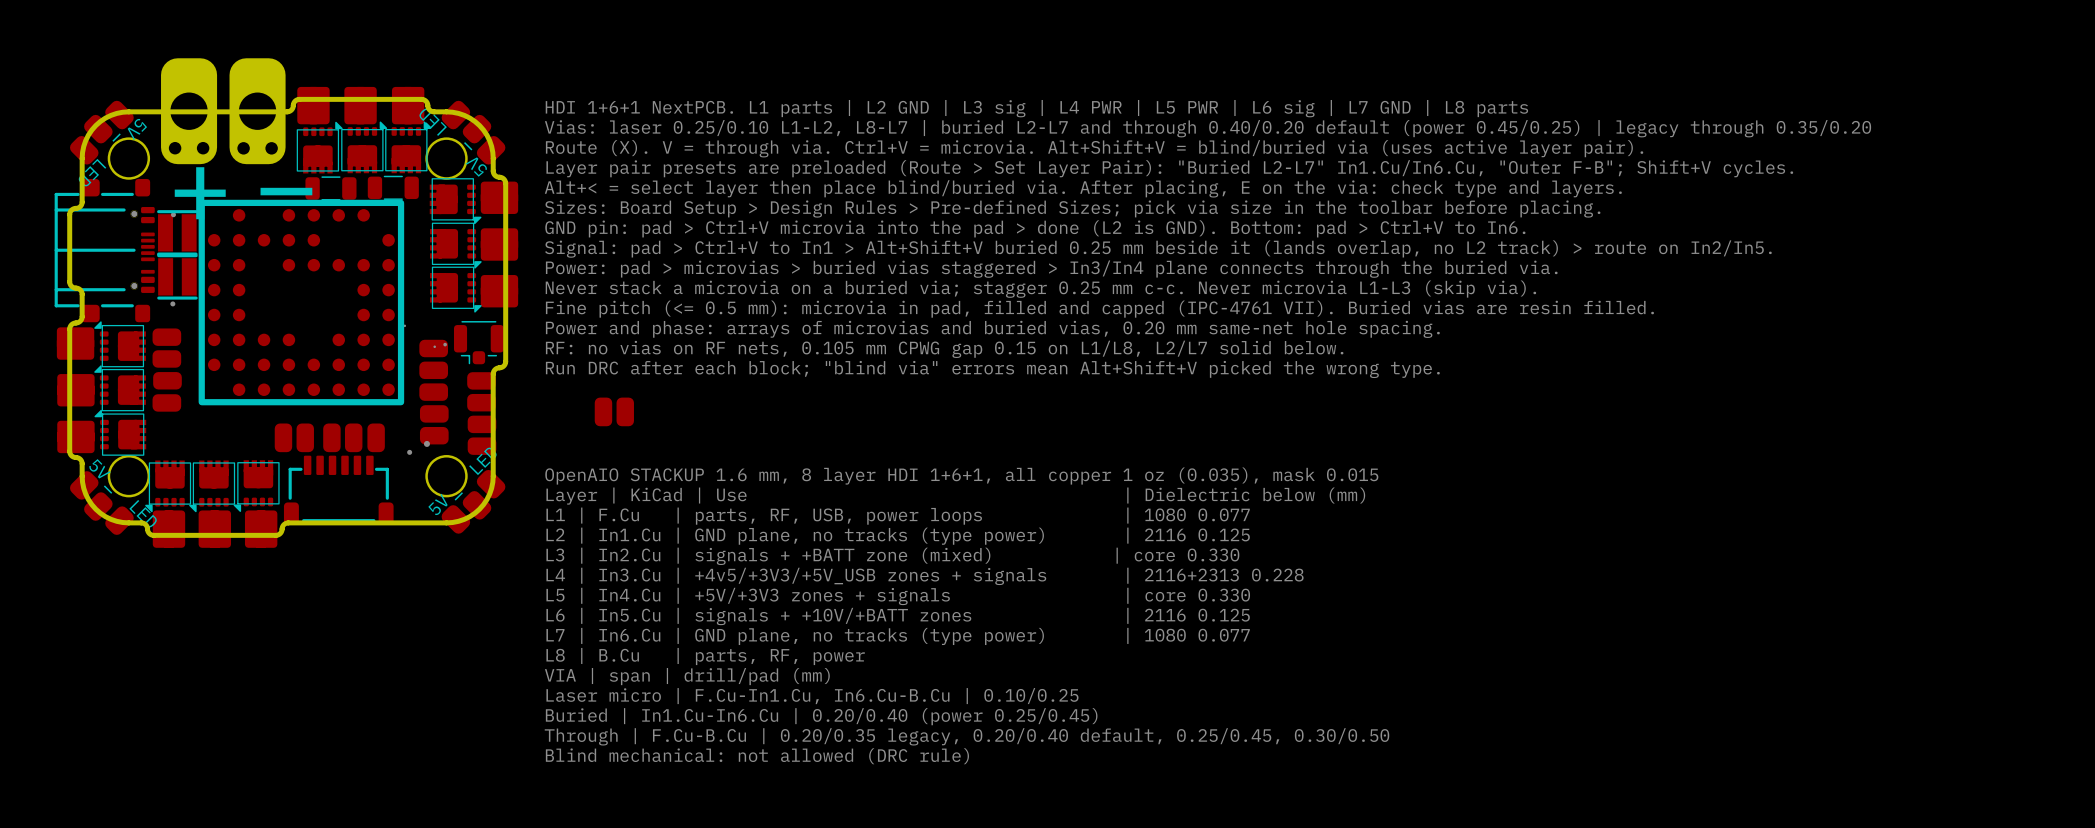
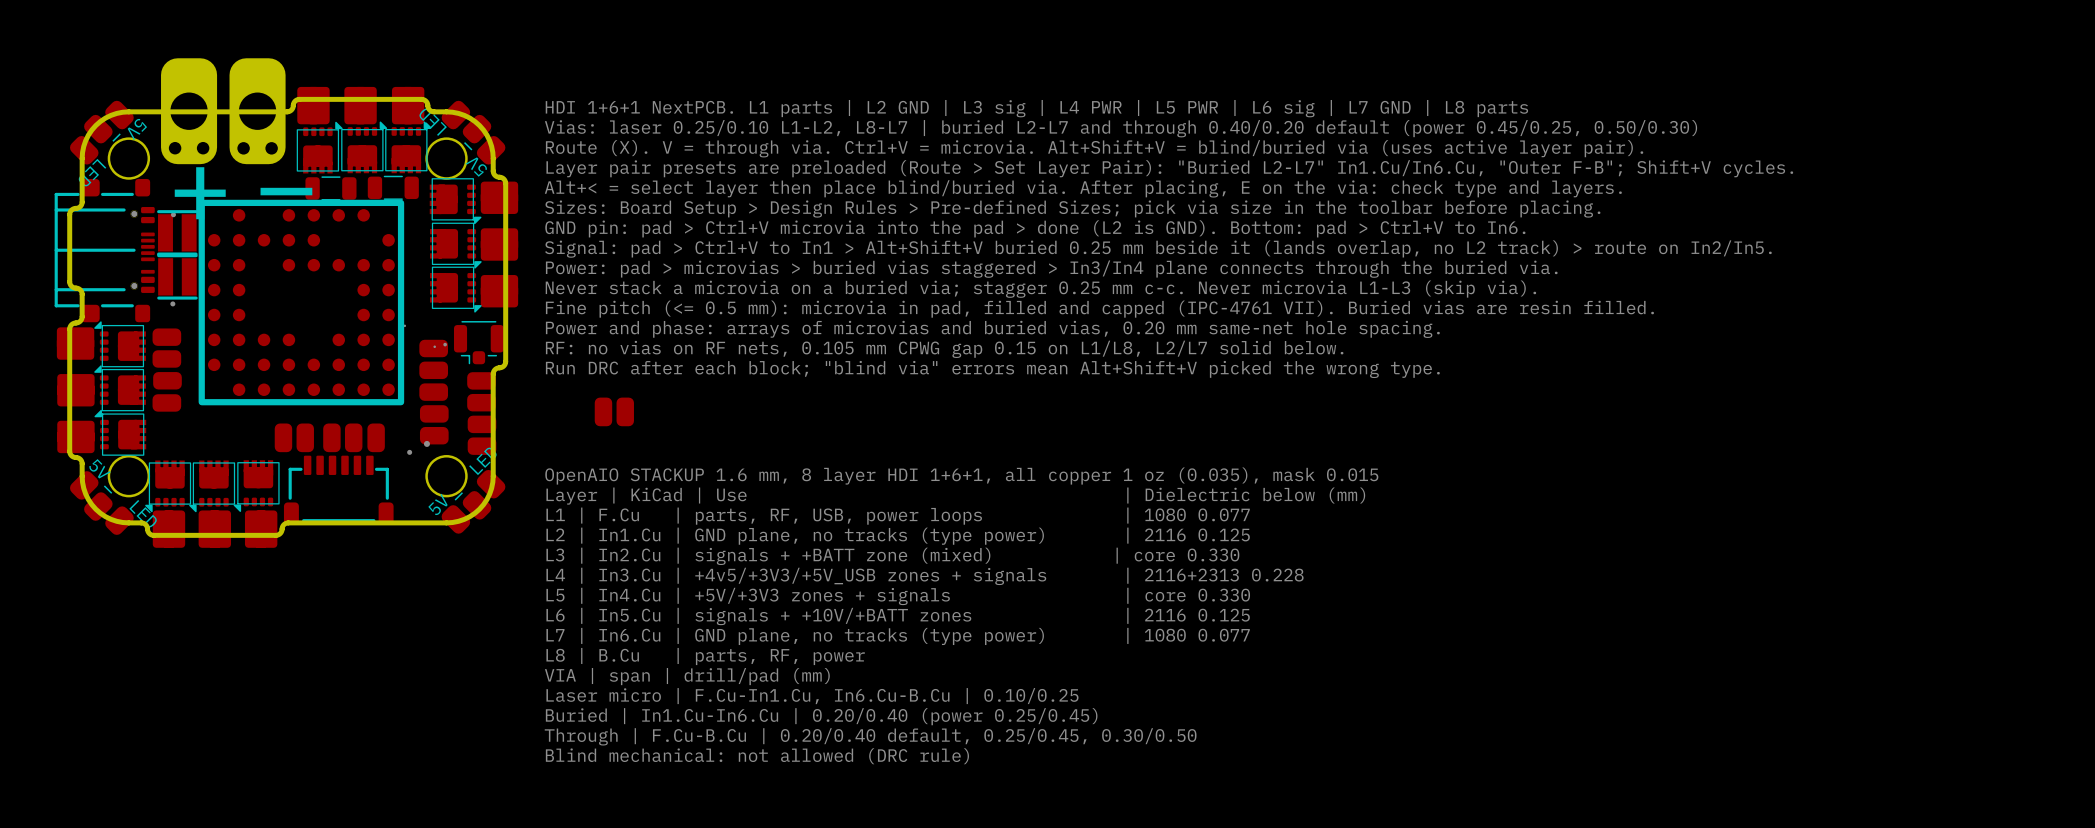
text: Vias: laser 0.25/0.10 L1-L2, L8-L7 | buried L2-L7 and through 0.40/0.20 default (power 0.45/0.25) | legacy through 0.35/0.20 (1208, 128) -> Vias: laser 0.25/0.10 L1-L2, L8-L7 | buried L2-L7 and through 0.40/0.20 default (power 0.45/0.25, 0.50/0.30) (1121, 128)
text: Through | F.Cu-B.Cu | 0.20/0.35 legacy, 0.20/0.40 default, 0.25/0.45, 0.30/0.50 (966, 736) -> Through | F.Cu-B.Cu | 0.20/0.40 default, 0.25/0.45, 0.30/0.50 (870, 736)

